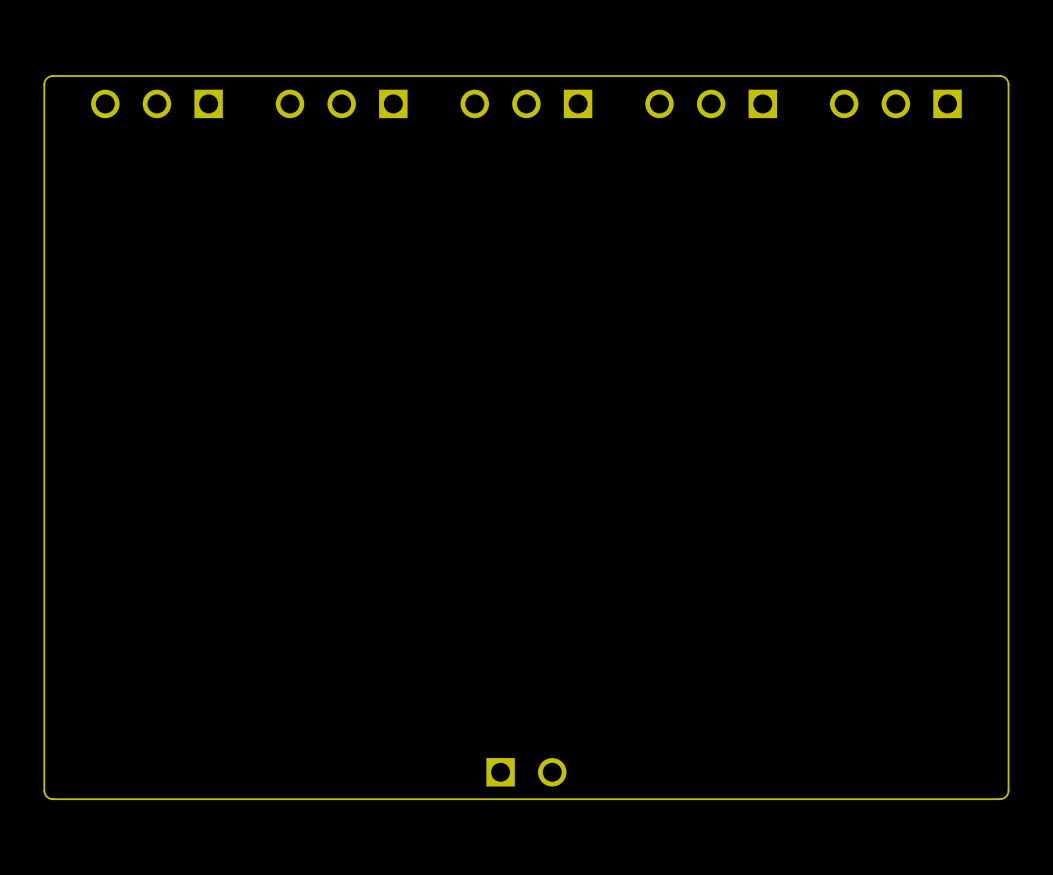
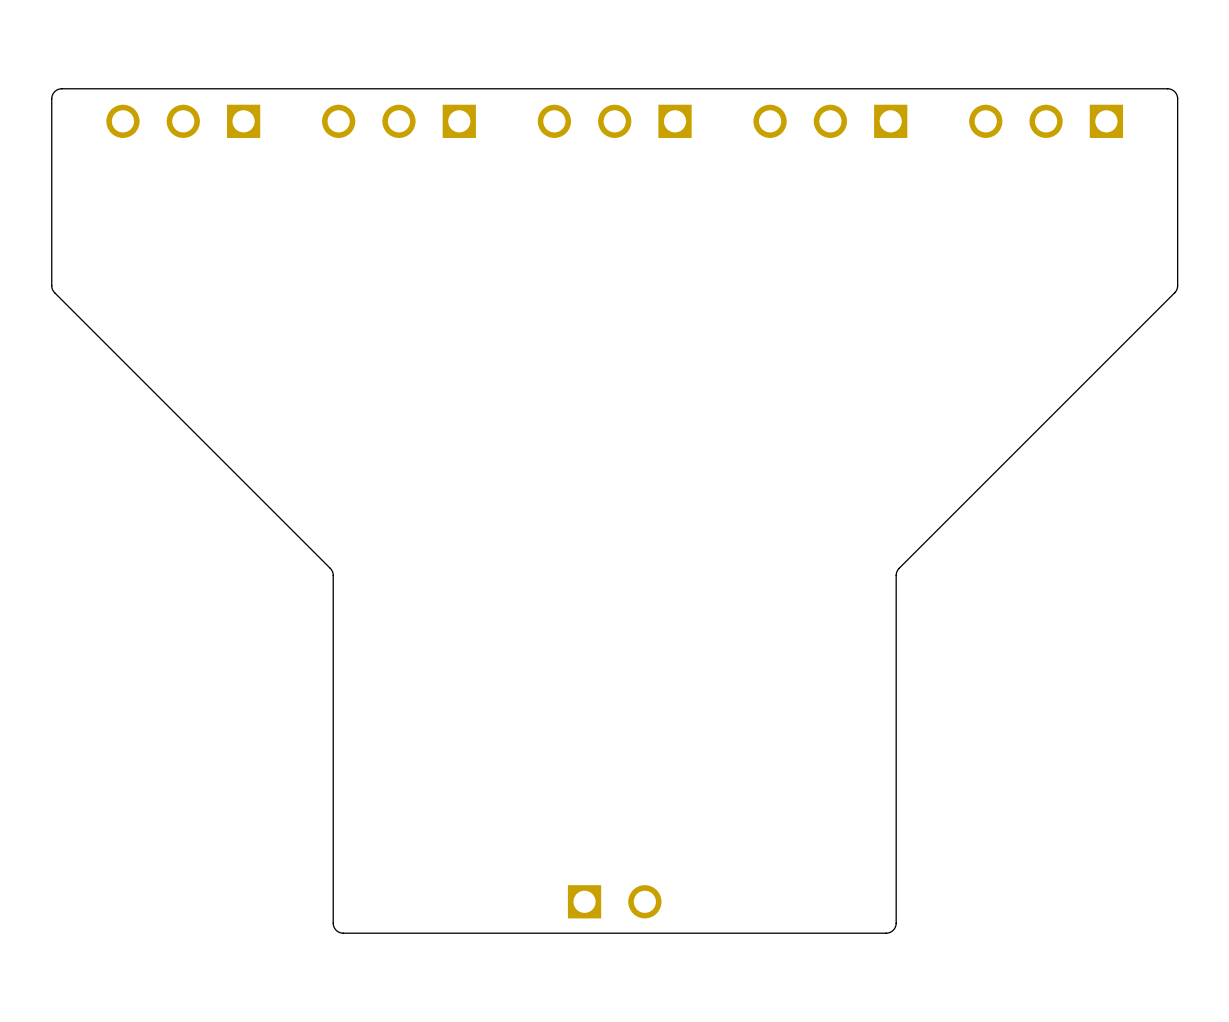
board edge: (44, 244) (45, 794) (52, 799) (293, 799) -> (51, 285) (54, 292) (332, 571) (333, 923) (336, 930) (343, 933)
board edge: (1008, 244) (1007, 794) (999, 799) (758, 799) -> (1177, 285) (1174, 292) (896, 571) (896, 923) (893, 930) (886, 933)

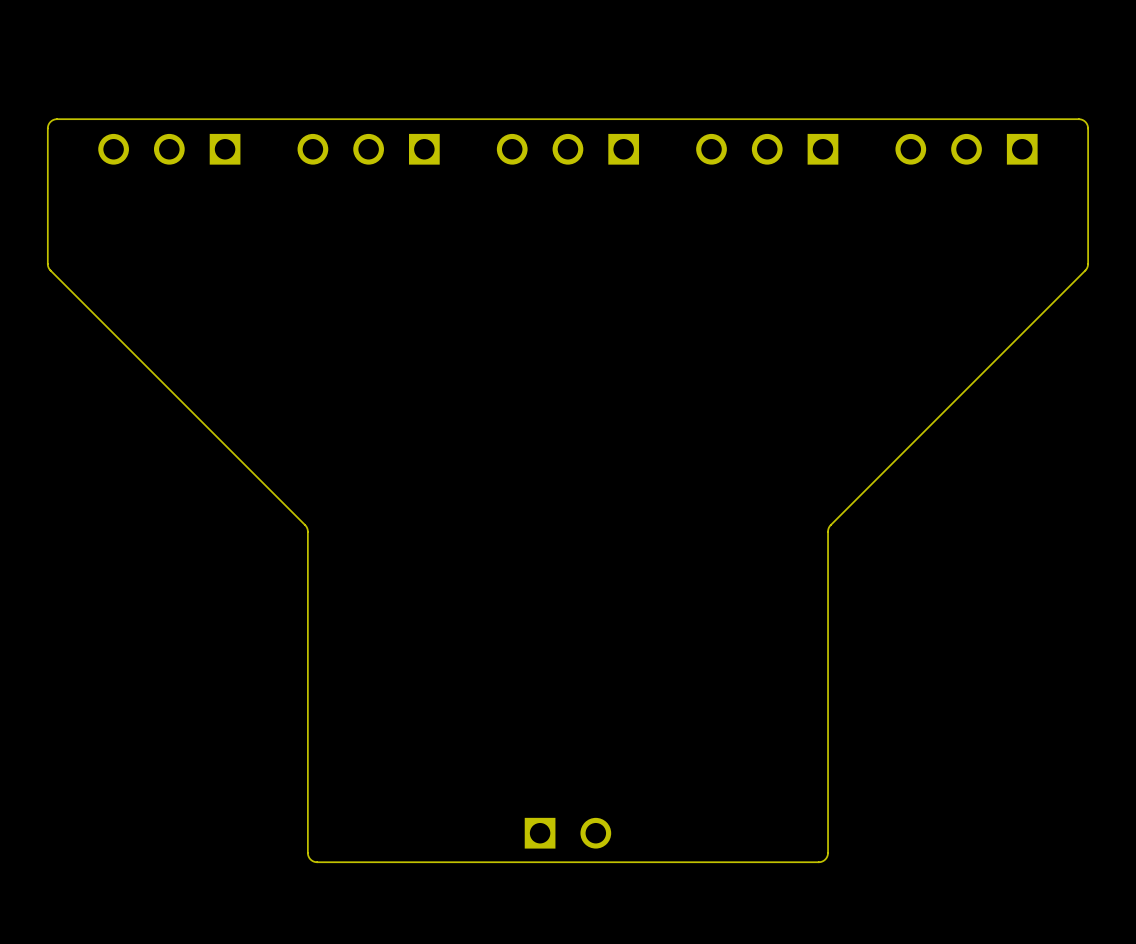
part position: (183, 121) -> (169, 149)
part position: (398, 121) -> (368, 149)
part position: (614, 121) -> (567, 149)
part position: (830, 121) -> (767, 149)
part position: (1046, 121) -> (966, 149)
board edge: (1177, 139) (1177, 96) (1173, 90) (1167, 88) (61, 88) (55, 90) (52, 96) (51, 139) -> (1088, 128) (1085, 121) (1078, 119) (57, 119) (50, 121) (47, 128)

